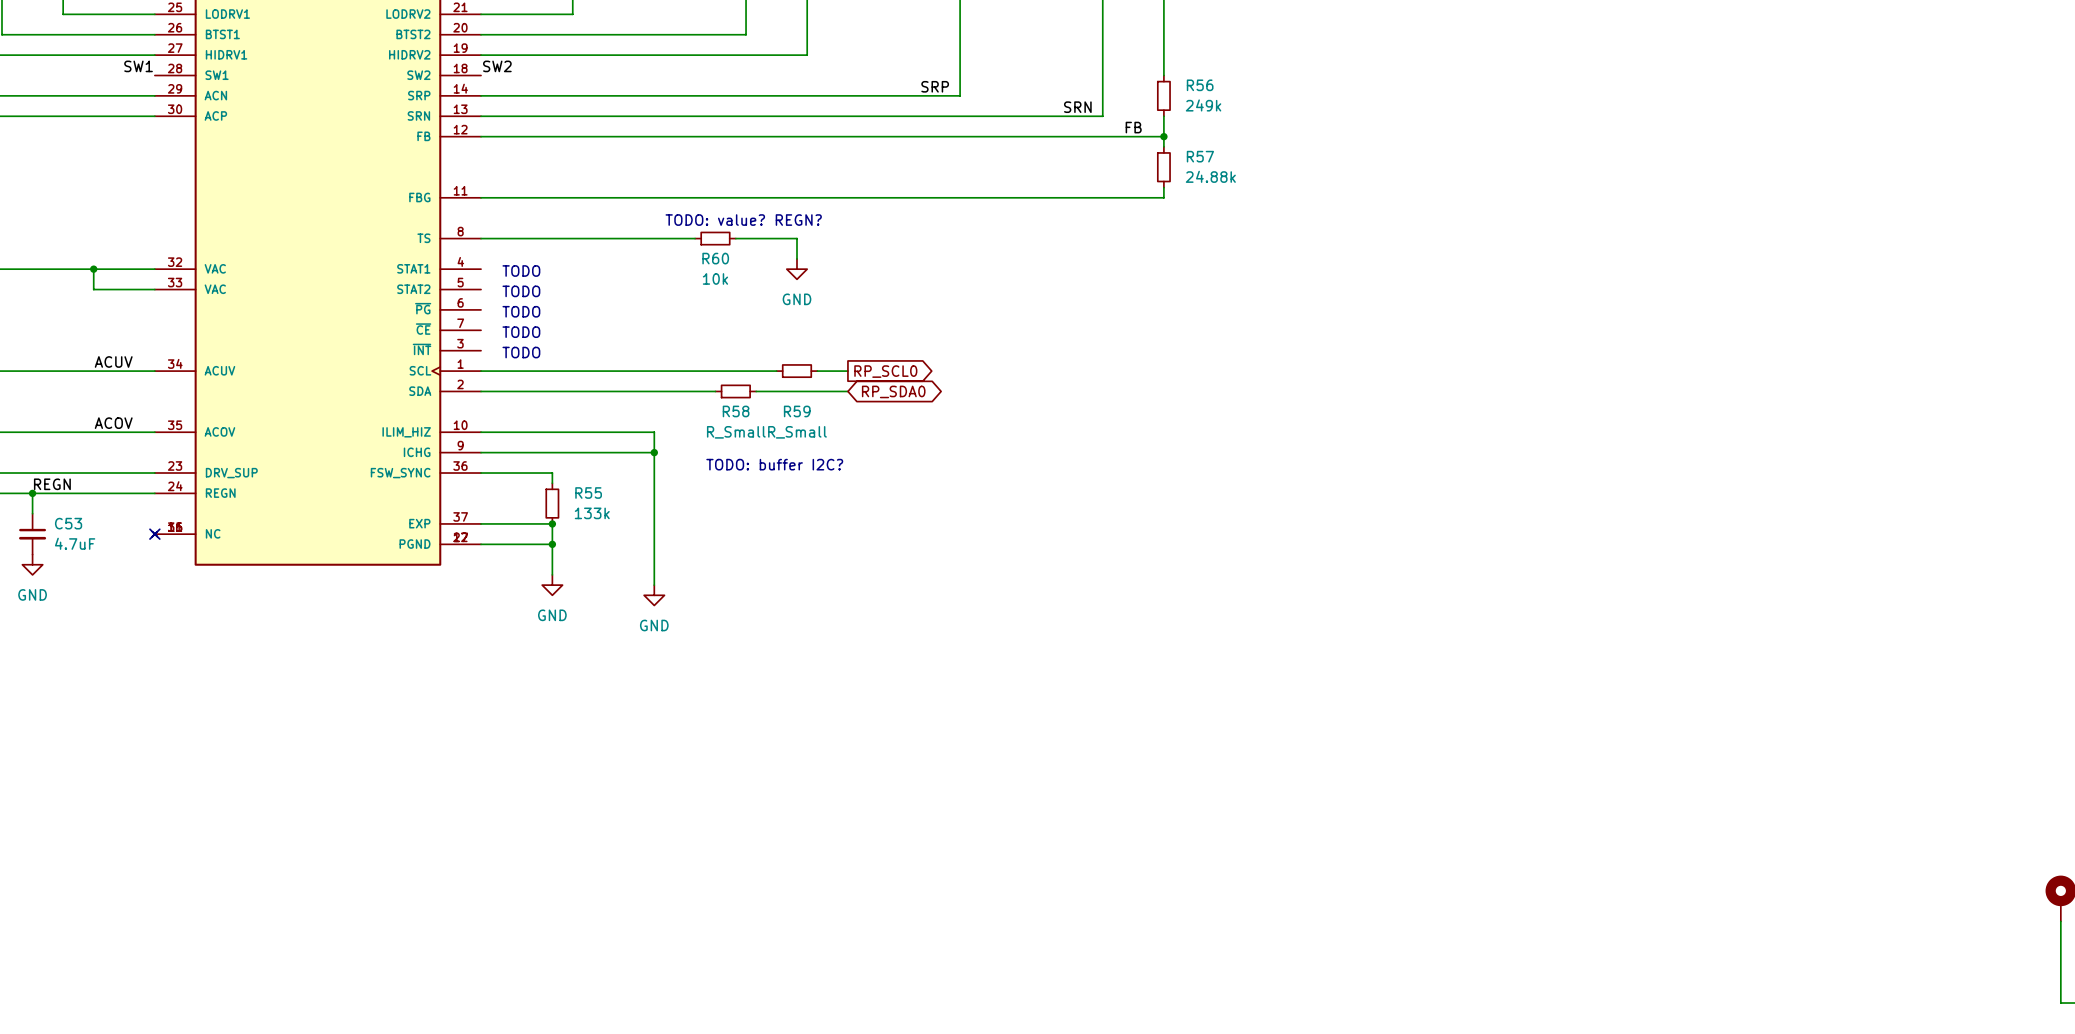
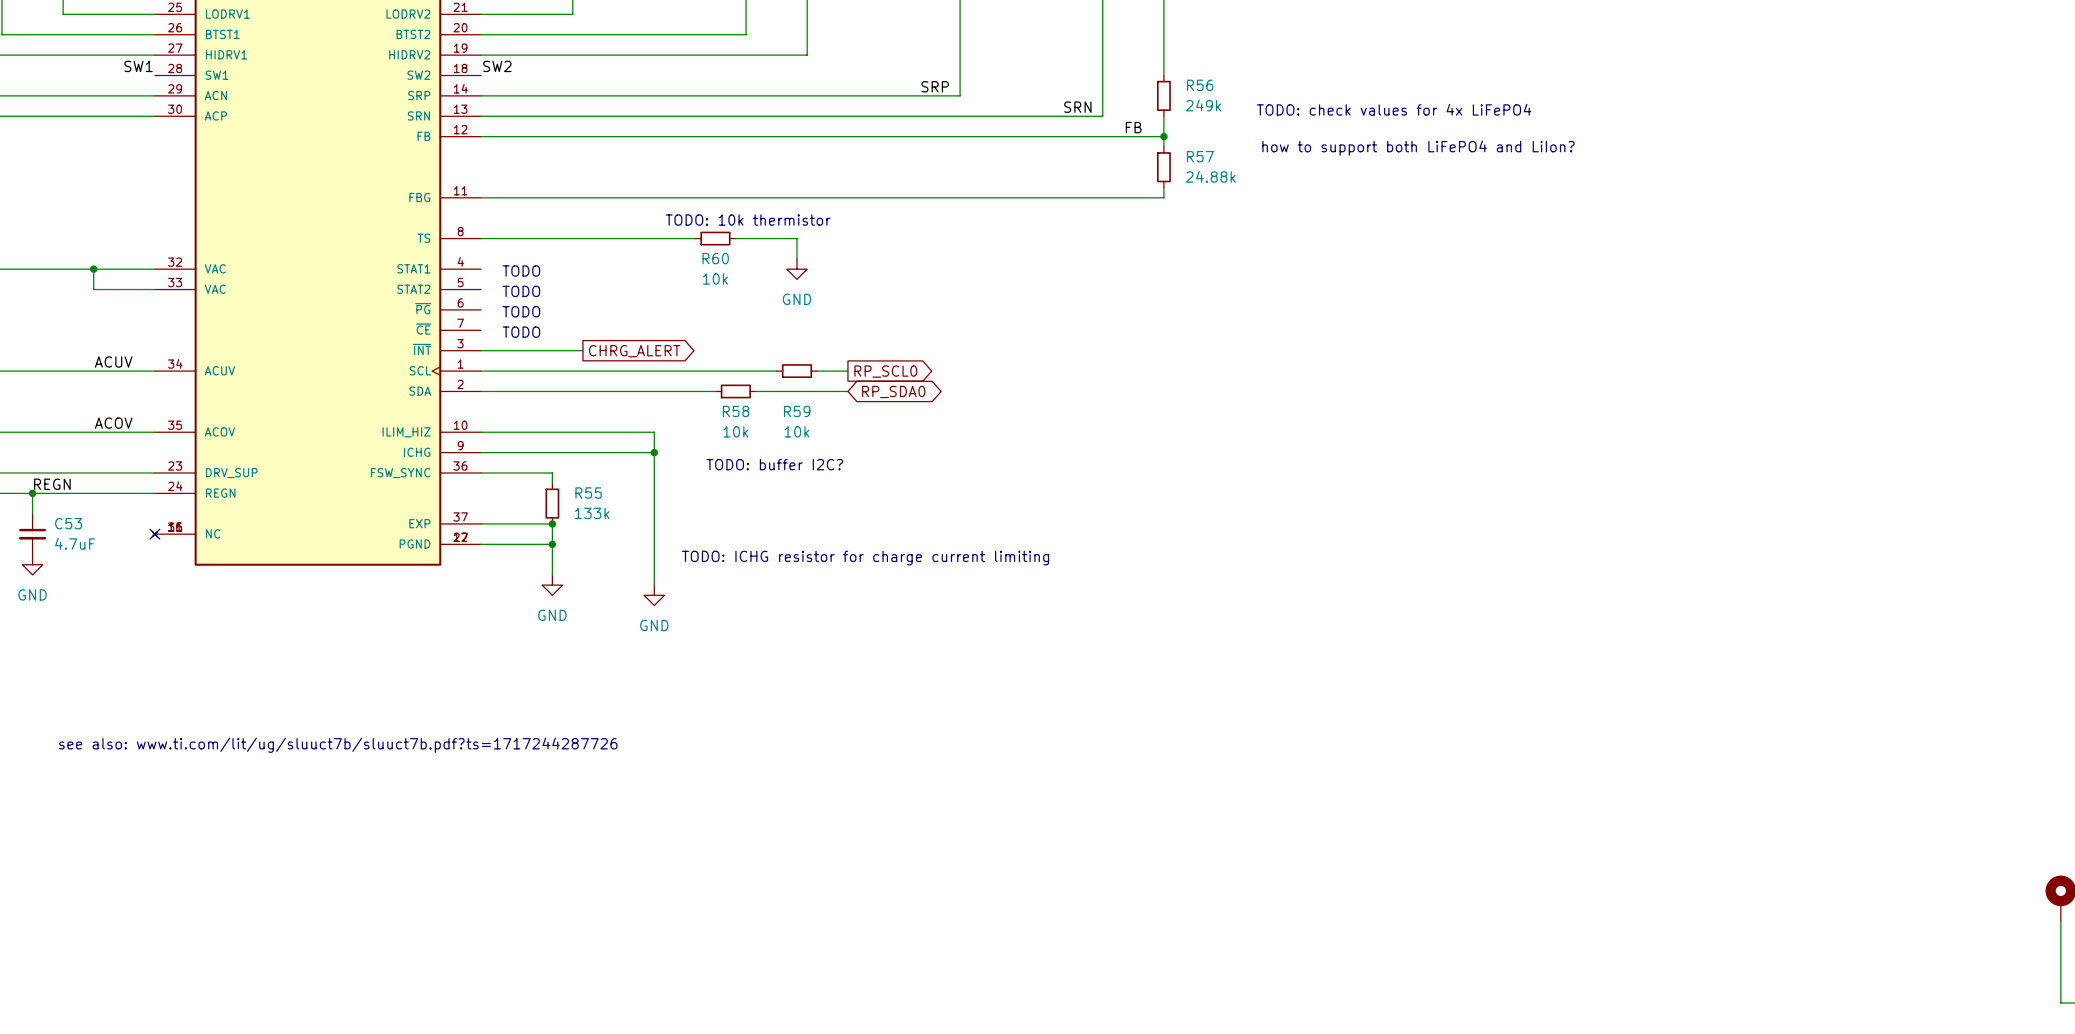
text: none -> TODO: check values for 4x LiFePO4 (1394, 109)
text: none -> how to support both LiFePO4 and LiIon? (1418, 148)
text: TODO: value? REGN? (743, 220) -> TODO: 10k thermistor (748, 220)
wire: none -> (481, 350) (582, 350)
global label: none -> CHRG_ALERT (634, 351)
text: TODO (521, 352) -> none
R58 value: R_Small (736, 432) -> 10k (735, 431)
R59 value: R_Small (797, 432) -> 10k (796, 431)
text: none -> TODO: ICHG resistor for charge current limiting (865, 558)
text: none -> see also: www.ti.com/lit/ug/sluuct7b/sluuct7b.pdf?ts=1717244287726 (338, 745)

